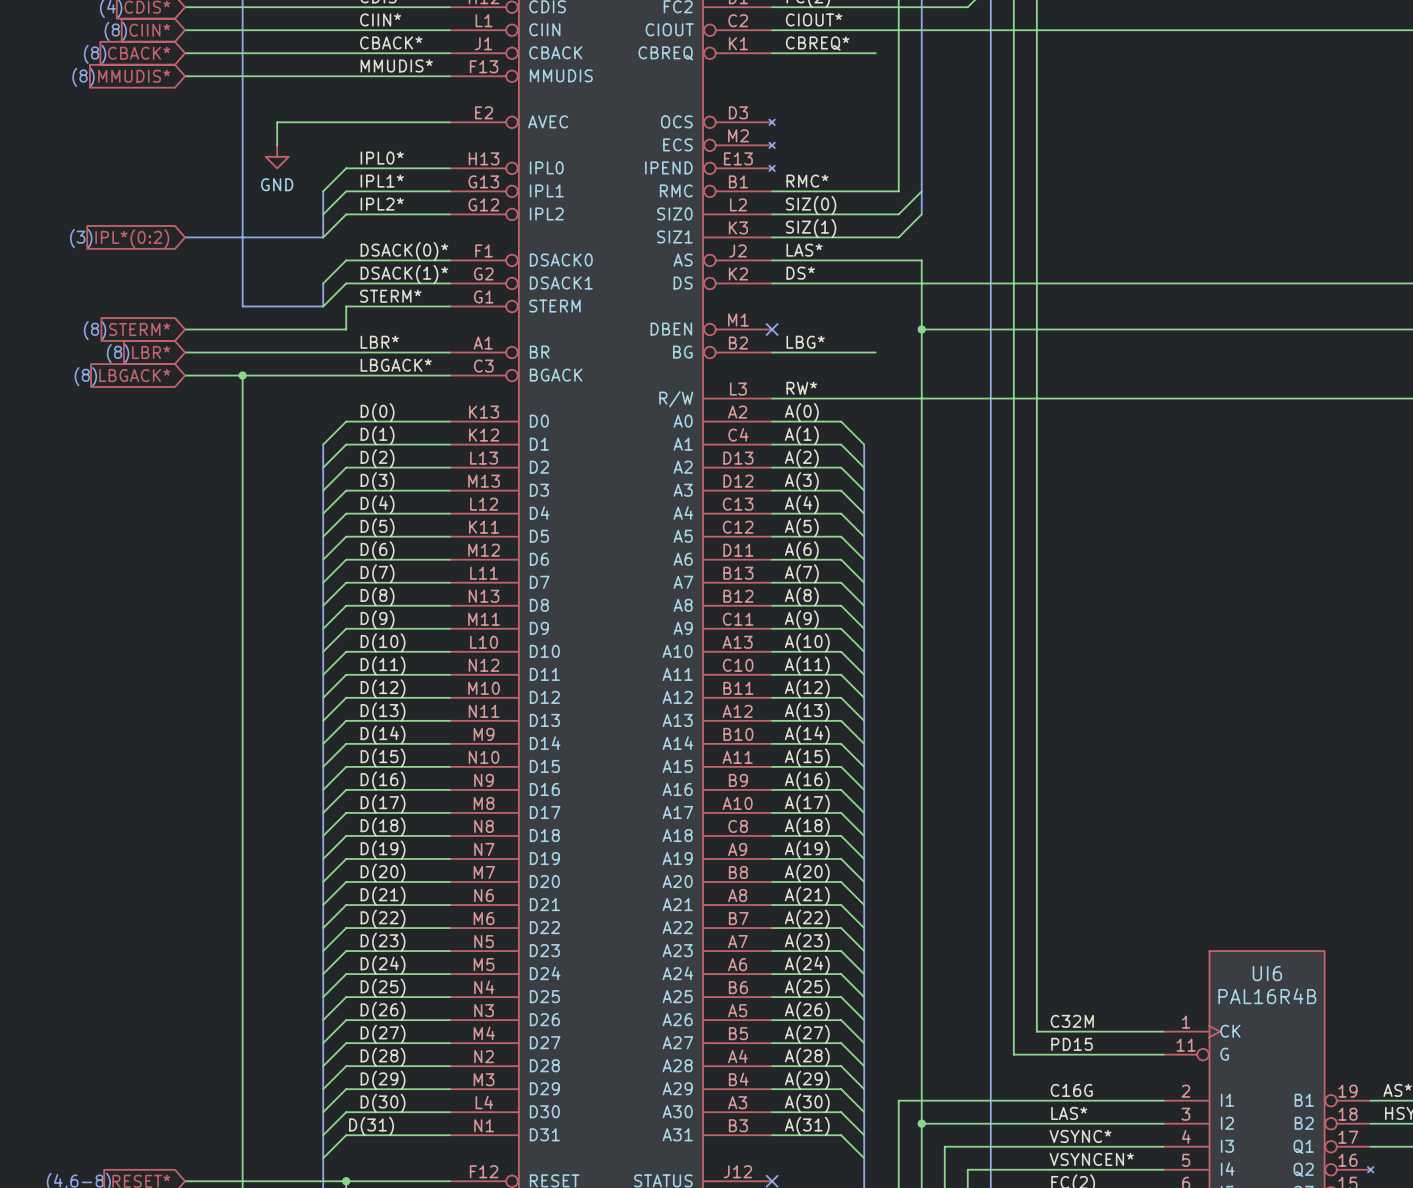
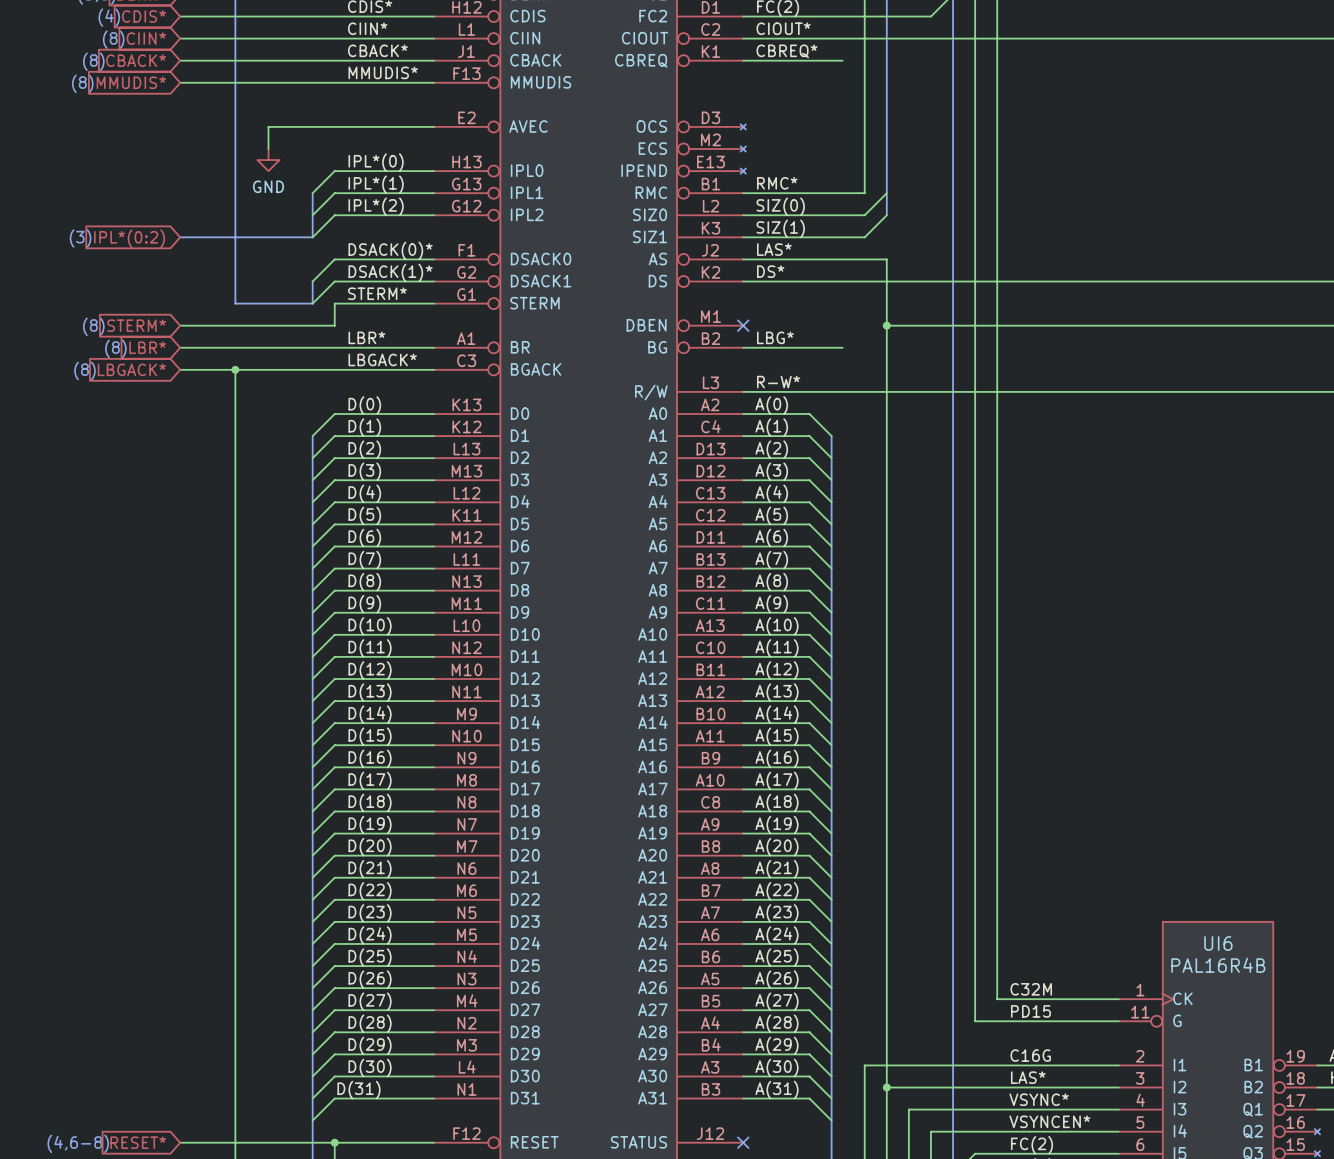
label: IPL0* (382, 158) -> IPL*(0) (376, 162)
label: IPL1* (382, 181) -> IPL*(1) (376, 184)
label: IPL2* (382, 204) -> IPL*(2) (376, 206)
label: RW* (801, 388) -> R-W* (778, 382)

